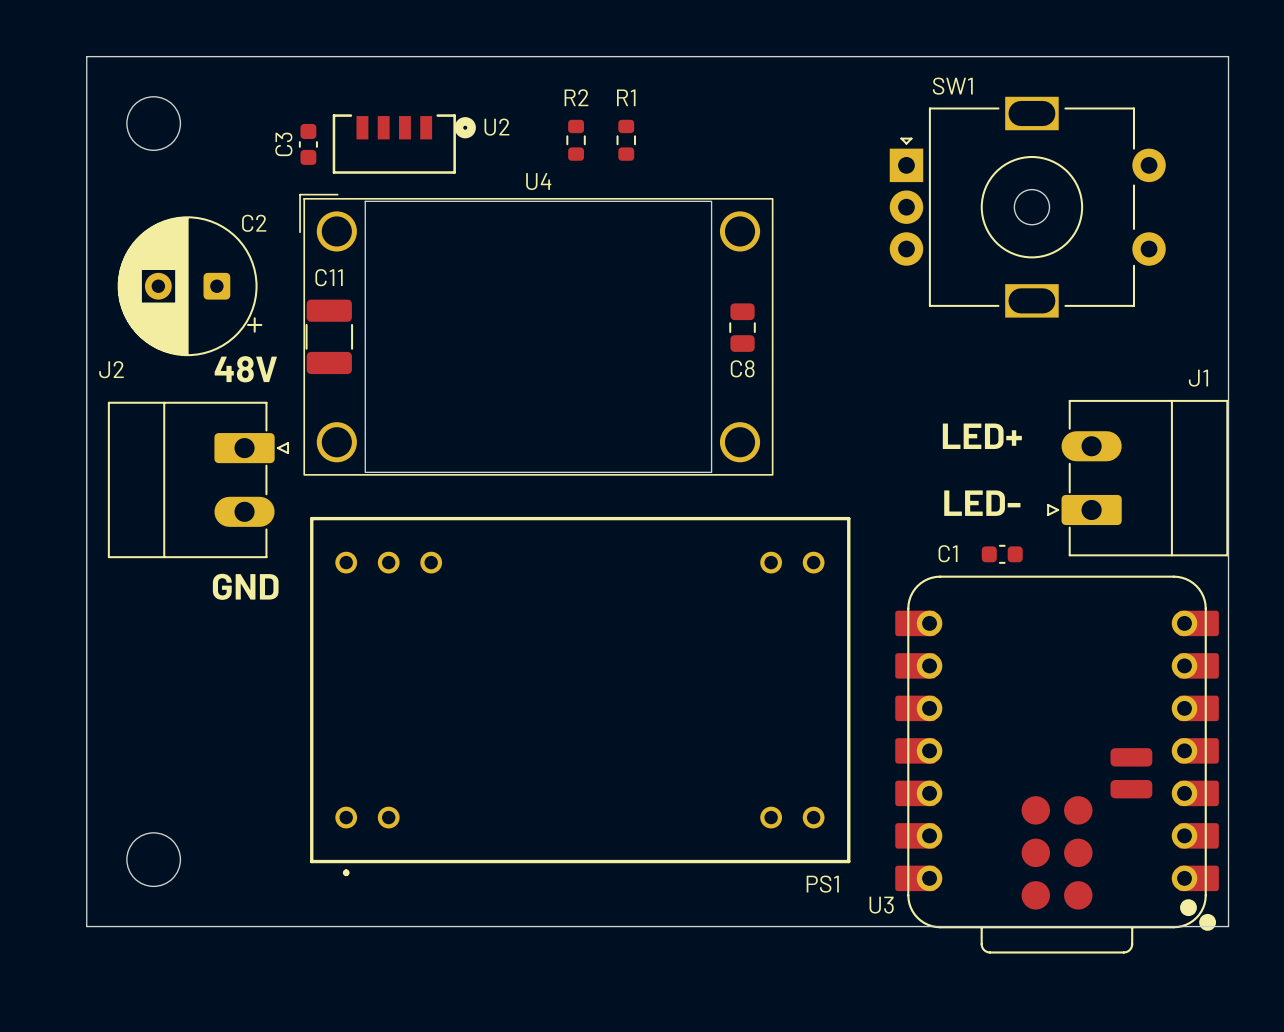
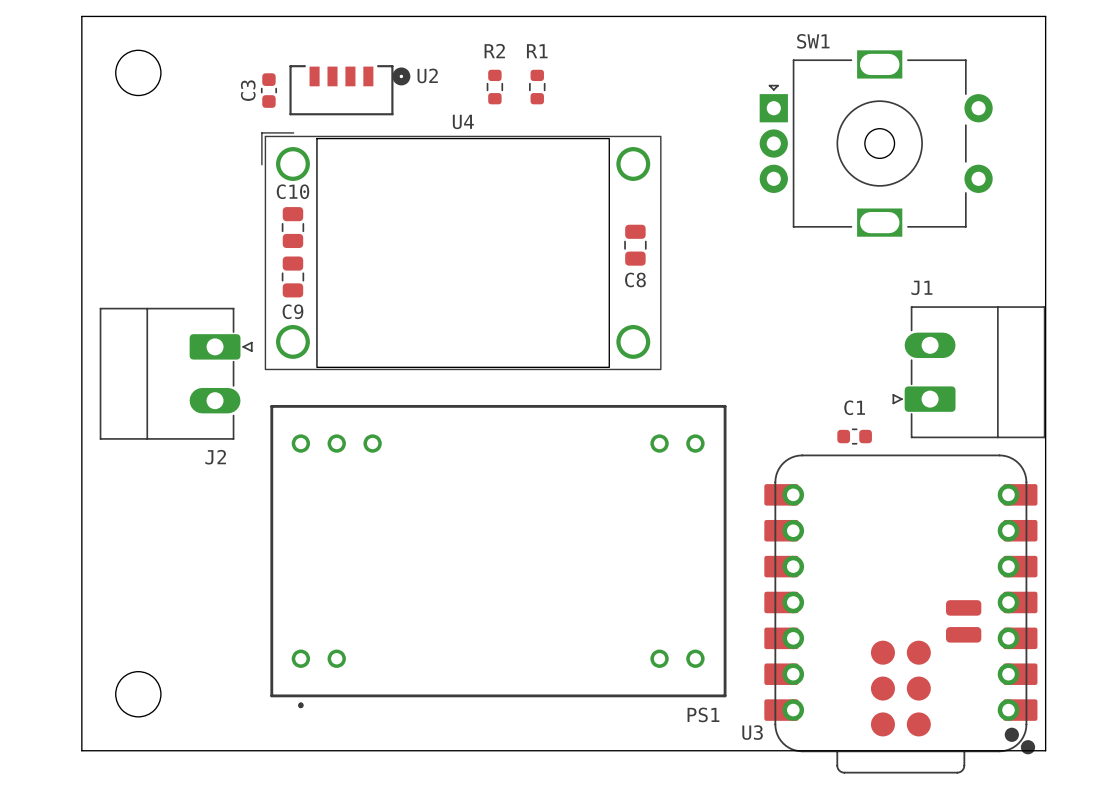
C2: (190, 286) -> none
C10: none -> (292, 227)
C11: (329, 336) -> none
C9: none -> (292, 276)
J2 name position: J2 (111, 369) -> J2 (215, 457)
text: 48V (245, 369) -> none
J1 name position: J1 (1198, 378) -> J1 (921, 287)
text: LED+ (982, 436) -> none
text: LED- (982, 503) -> none
C1 name position: C1 (948, 553) -> C1 (854, 407)
text: GND (245, 586) -> none

